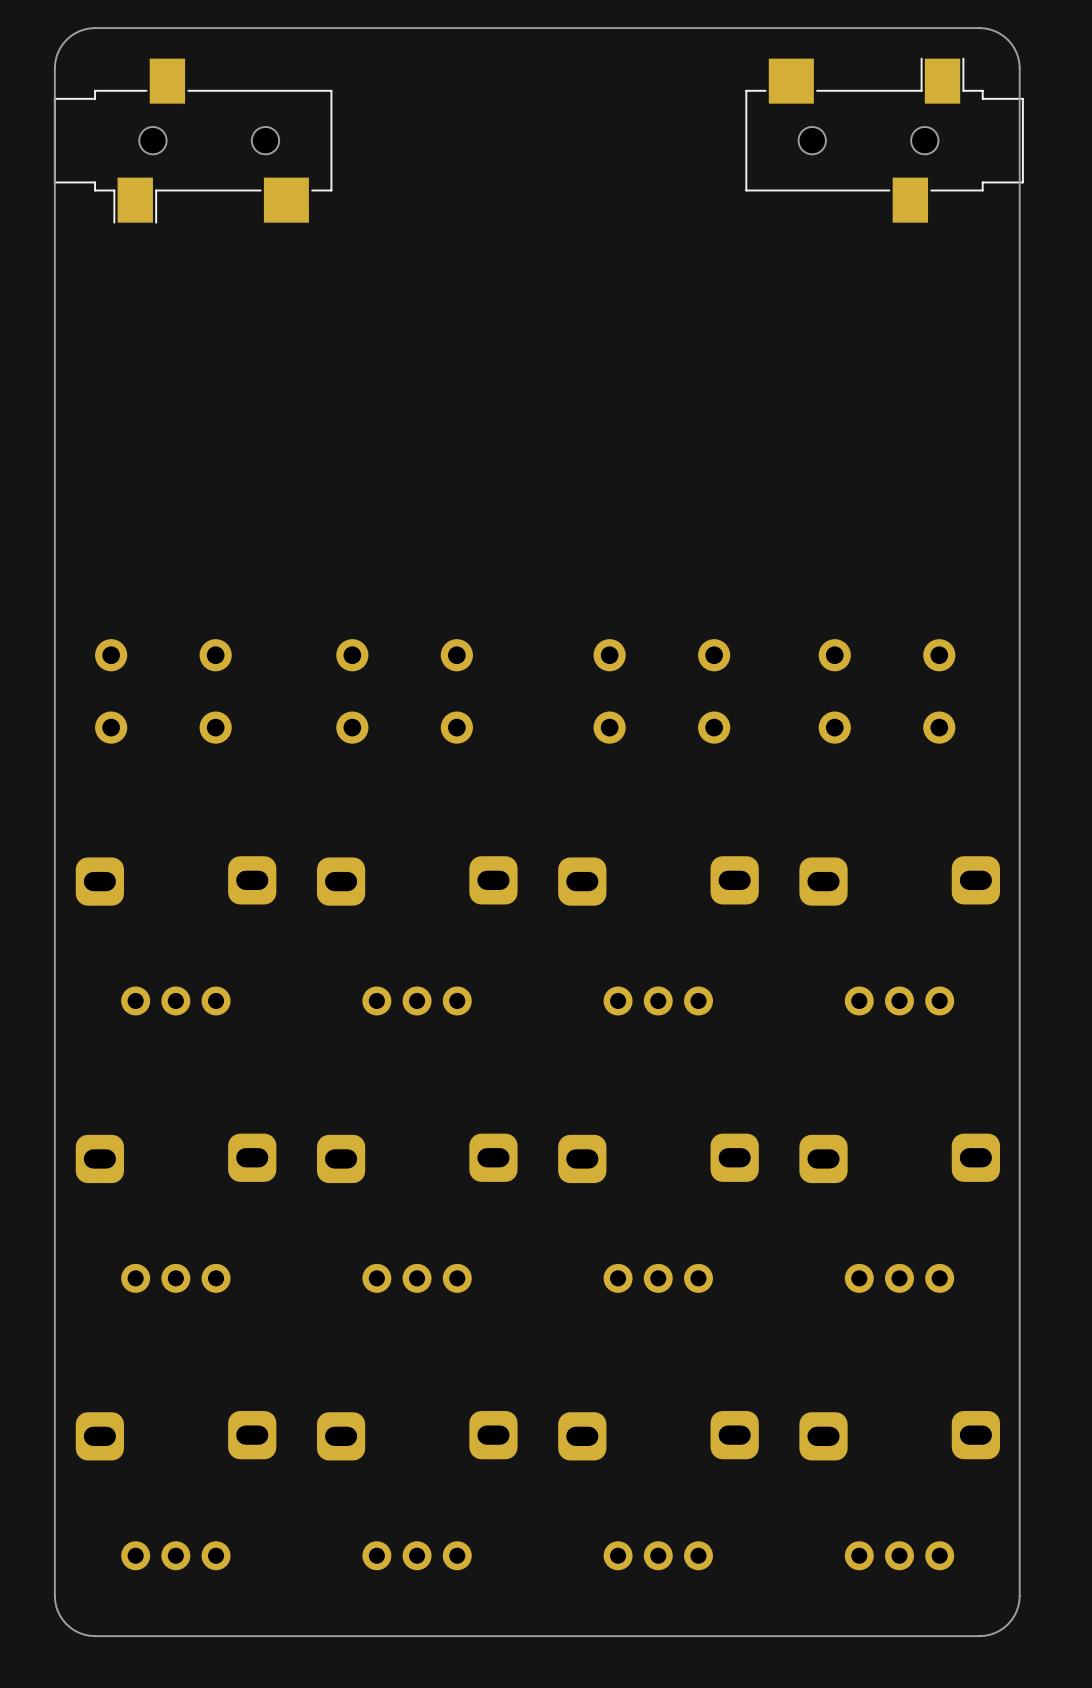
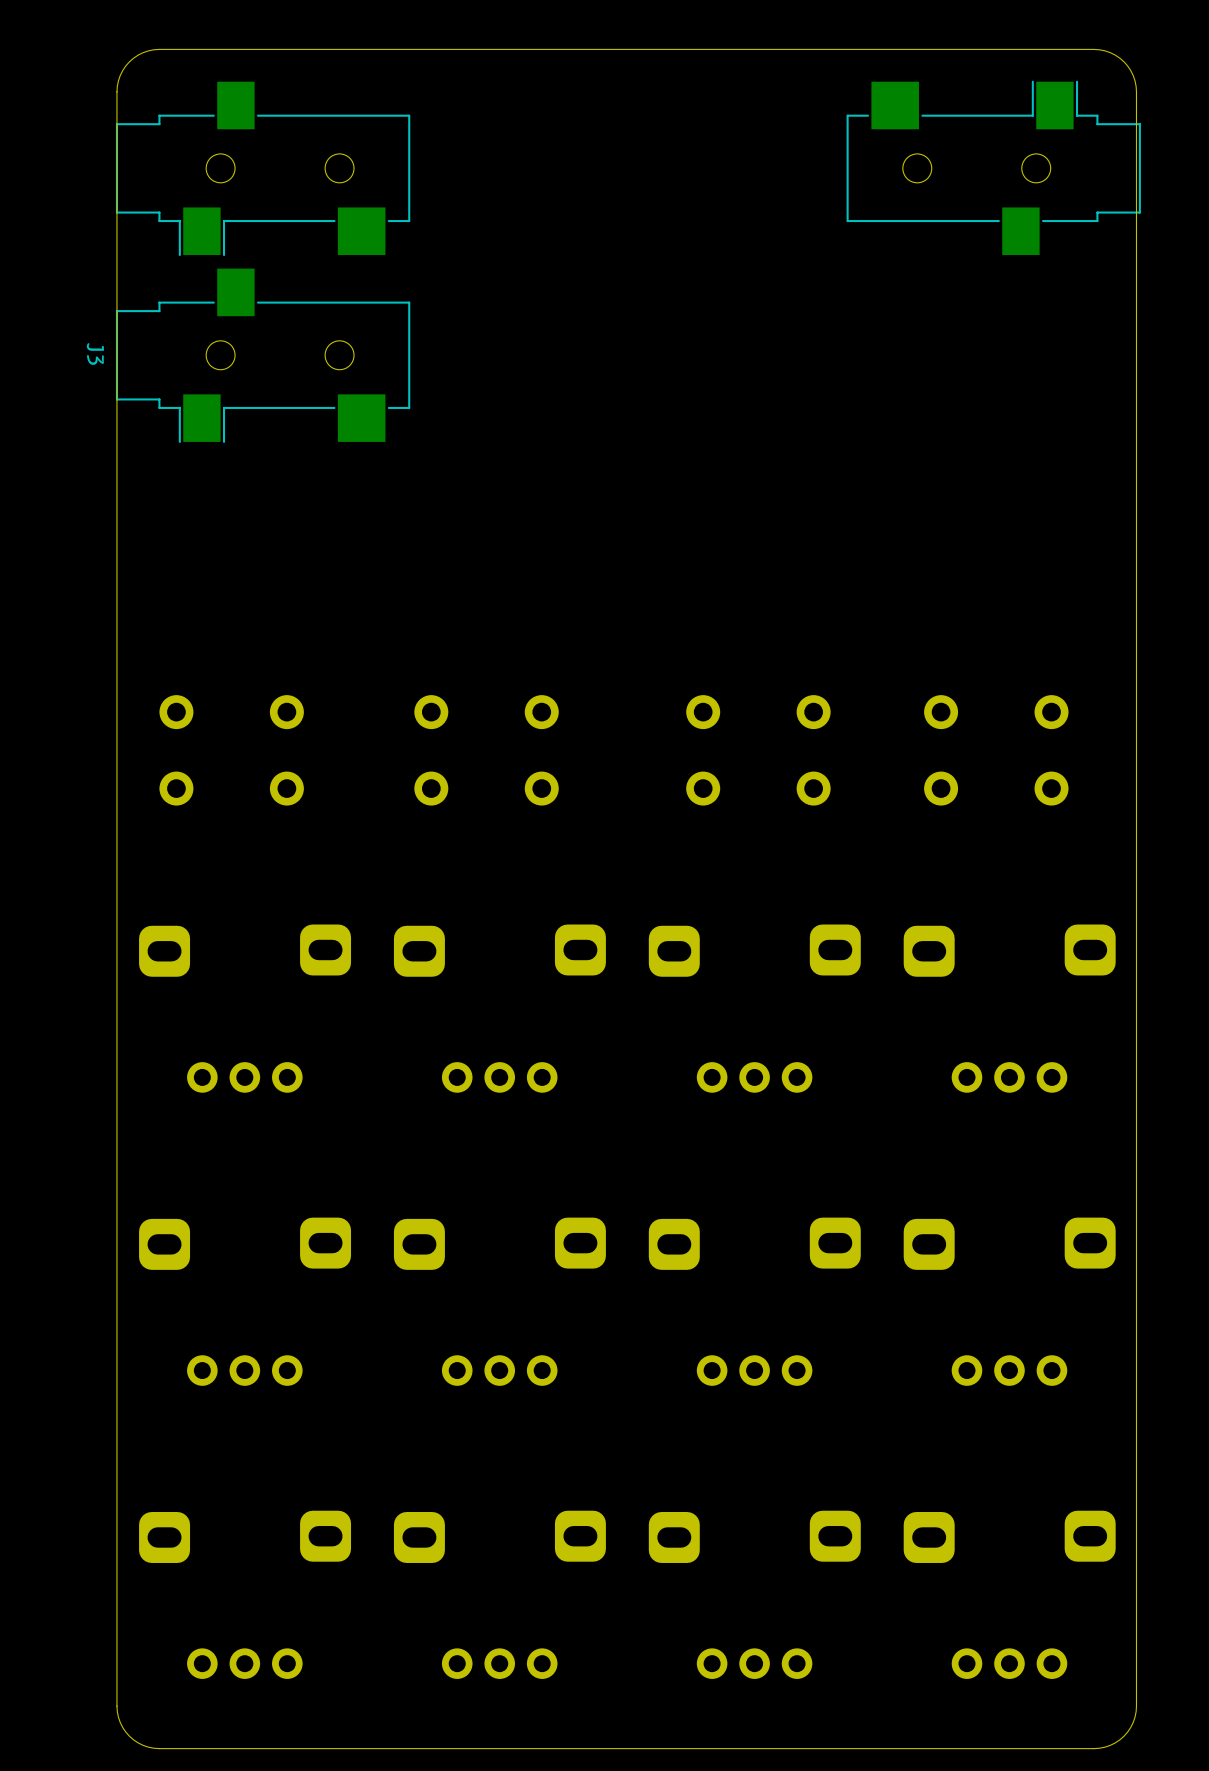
J3: none -> (263, 355)

